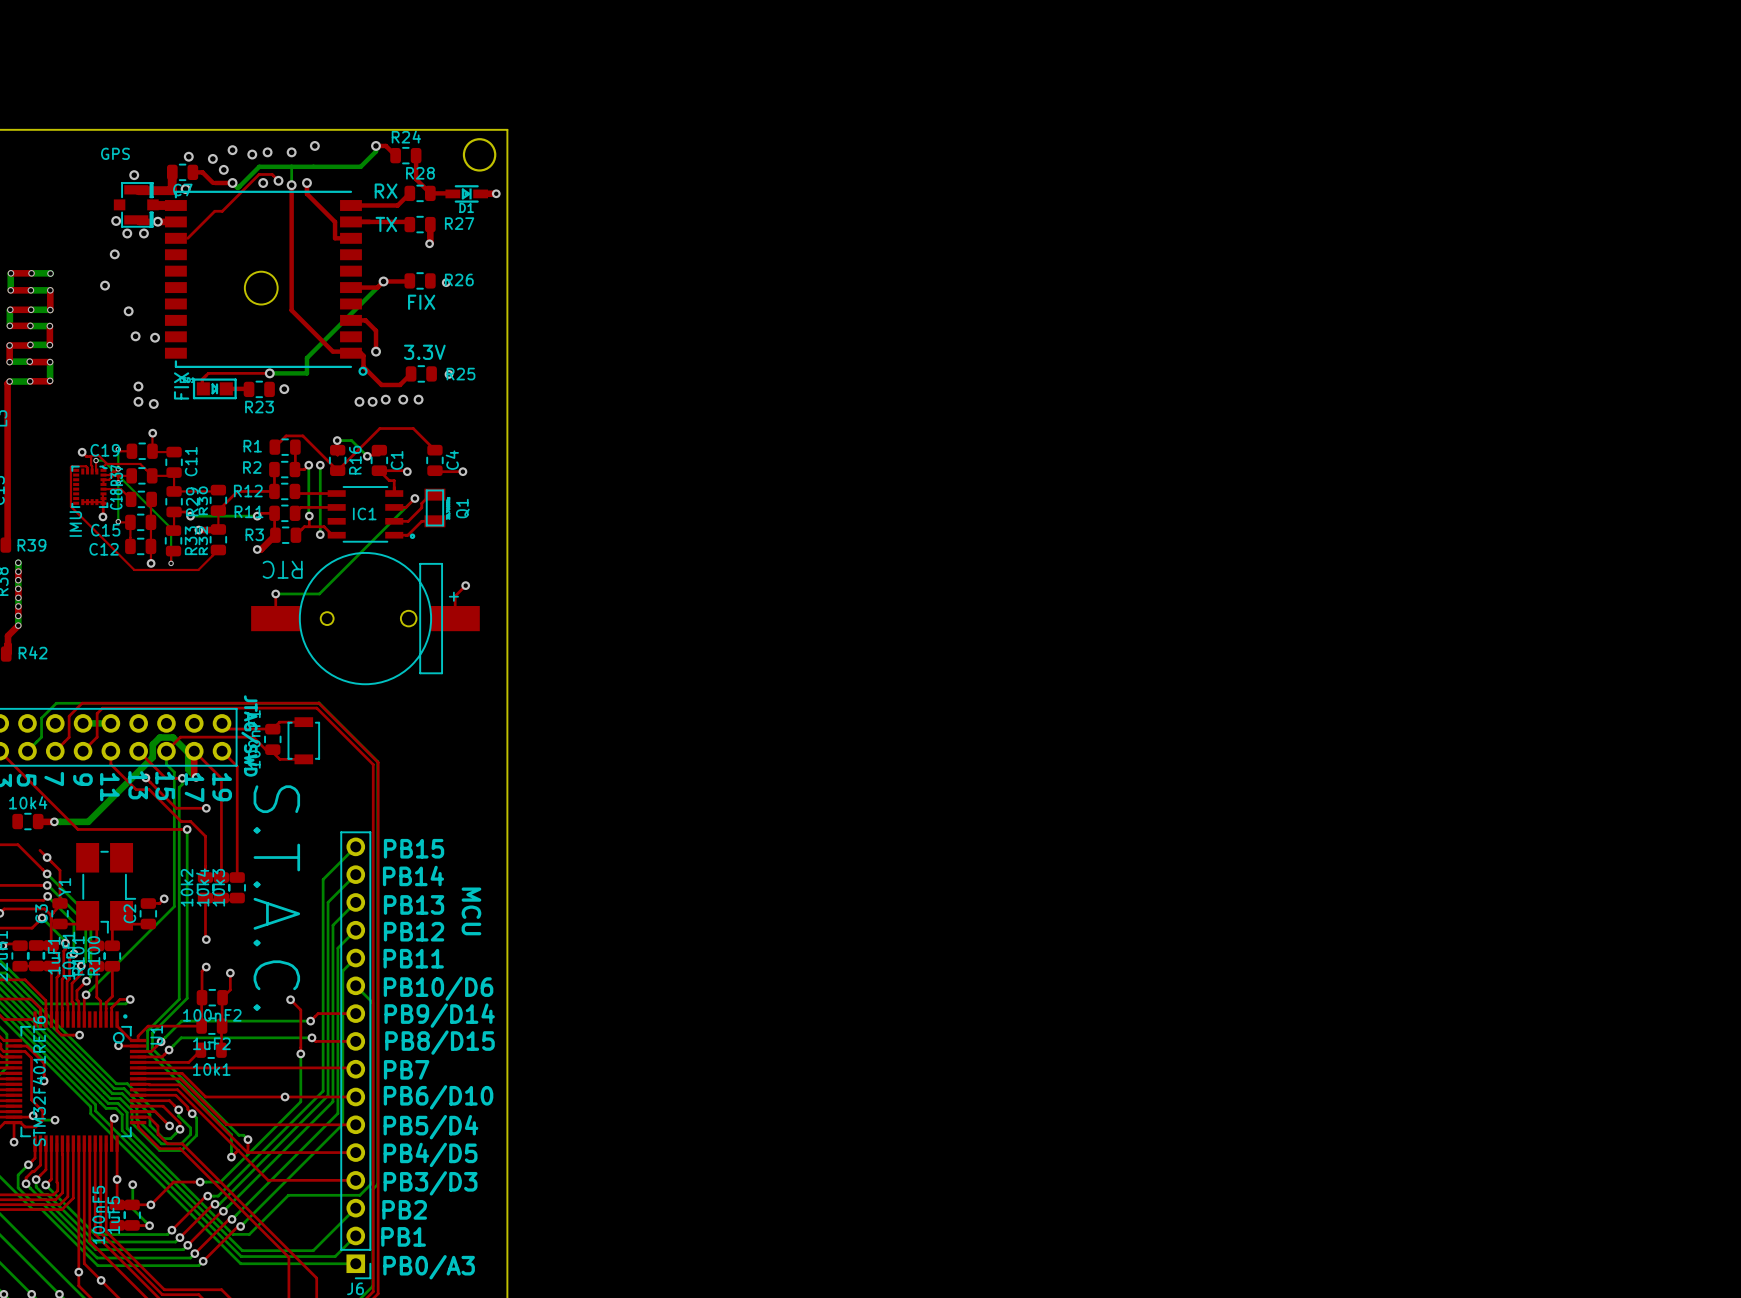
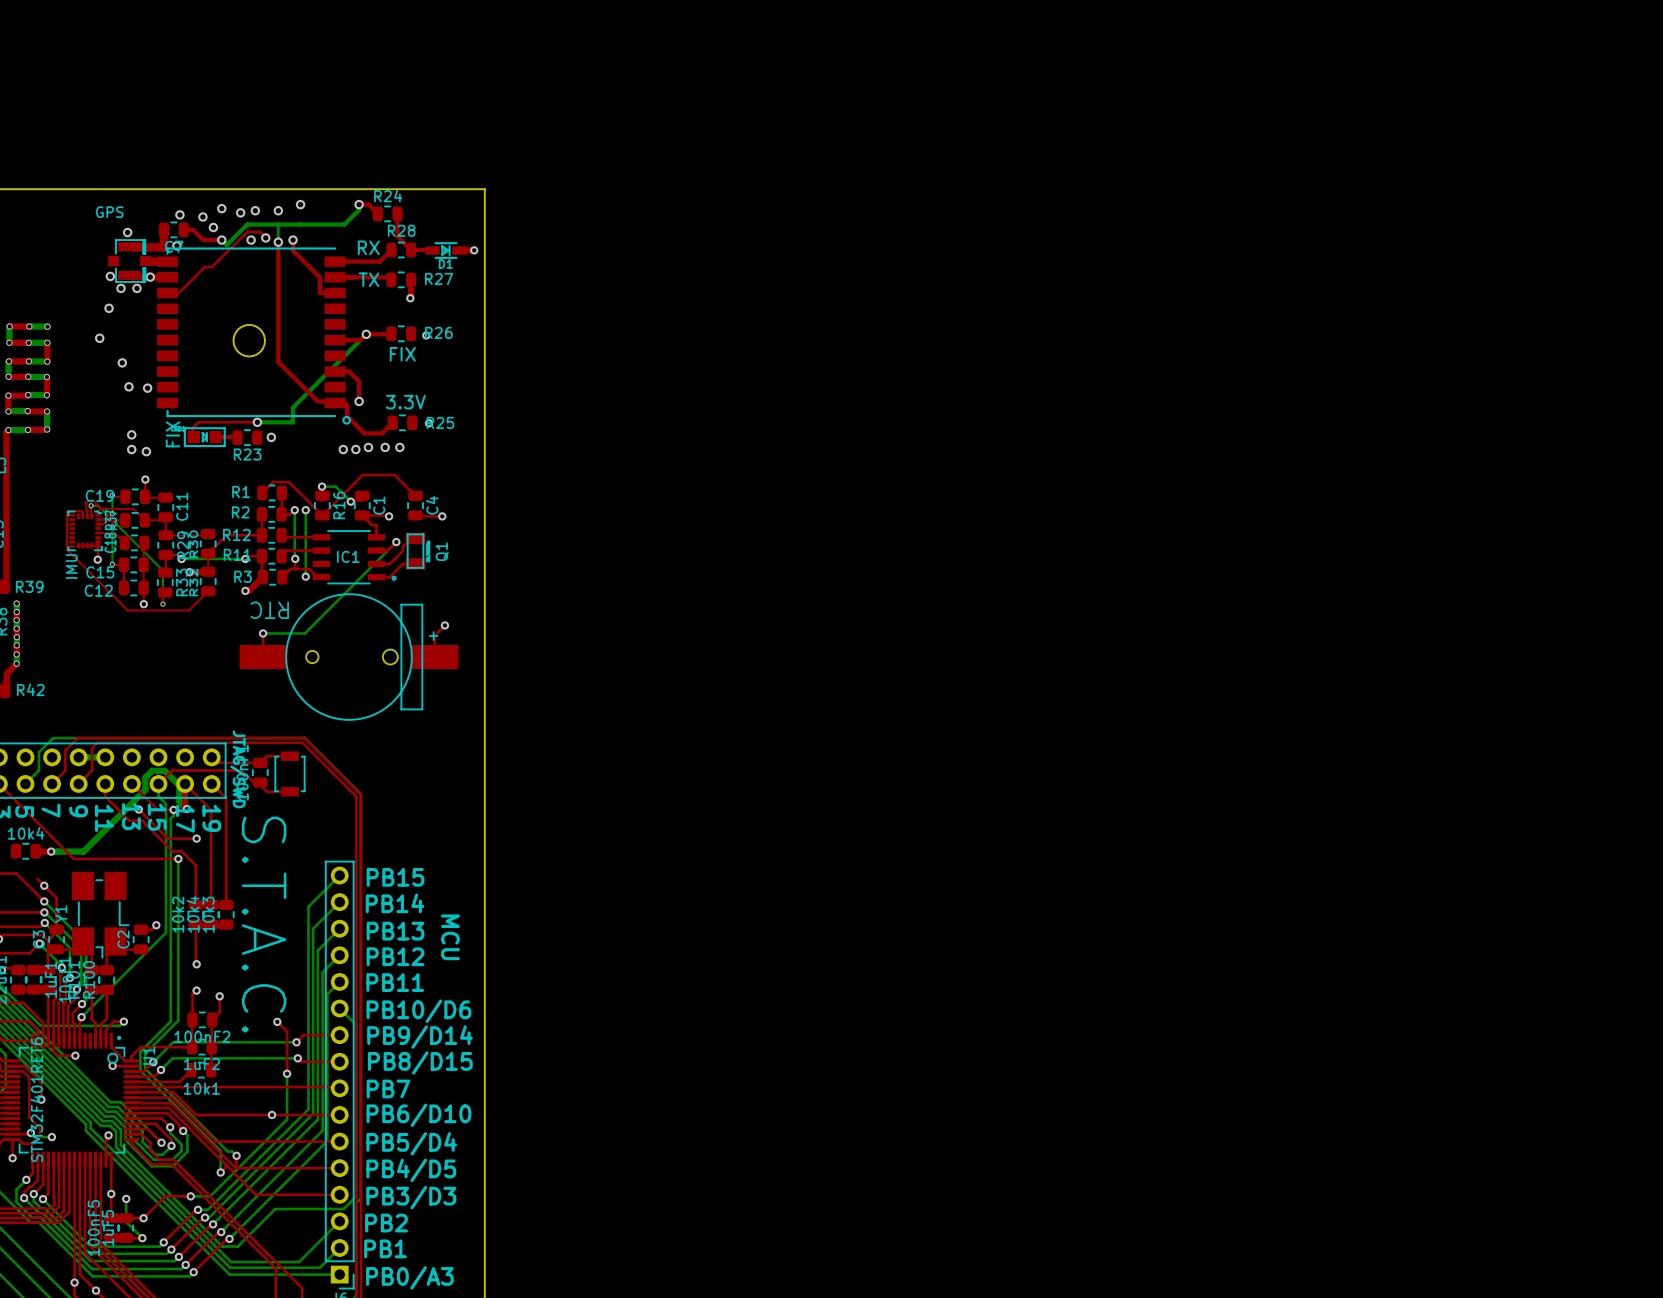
round board edge: [462, 138, 497, 172] -> none
top track: (82, 452) (86, 456) (90, 456) -> none
via: (82, 452) -> none

